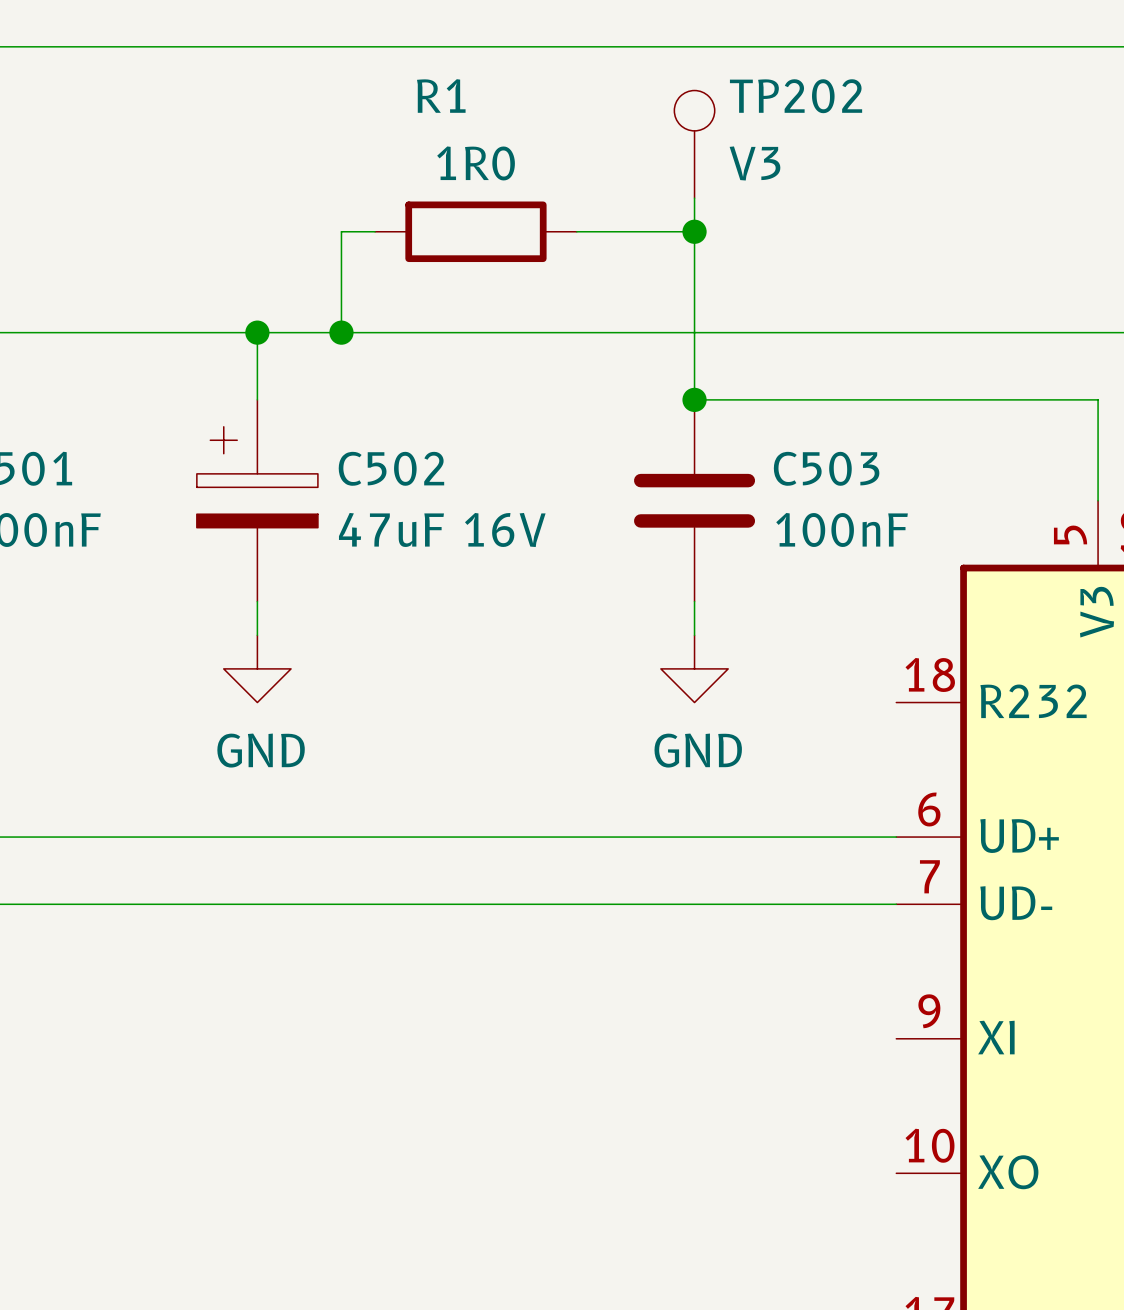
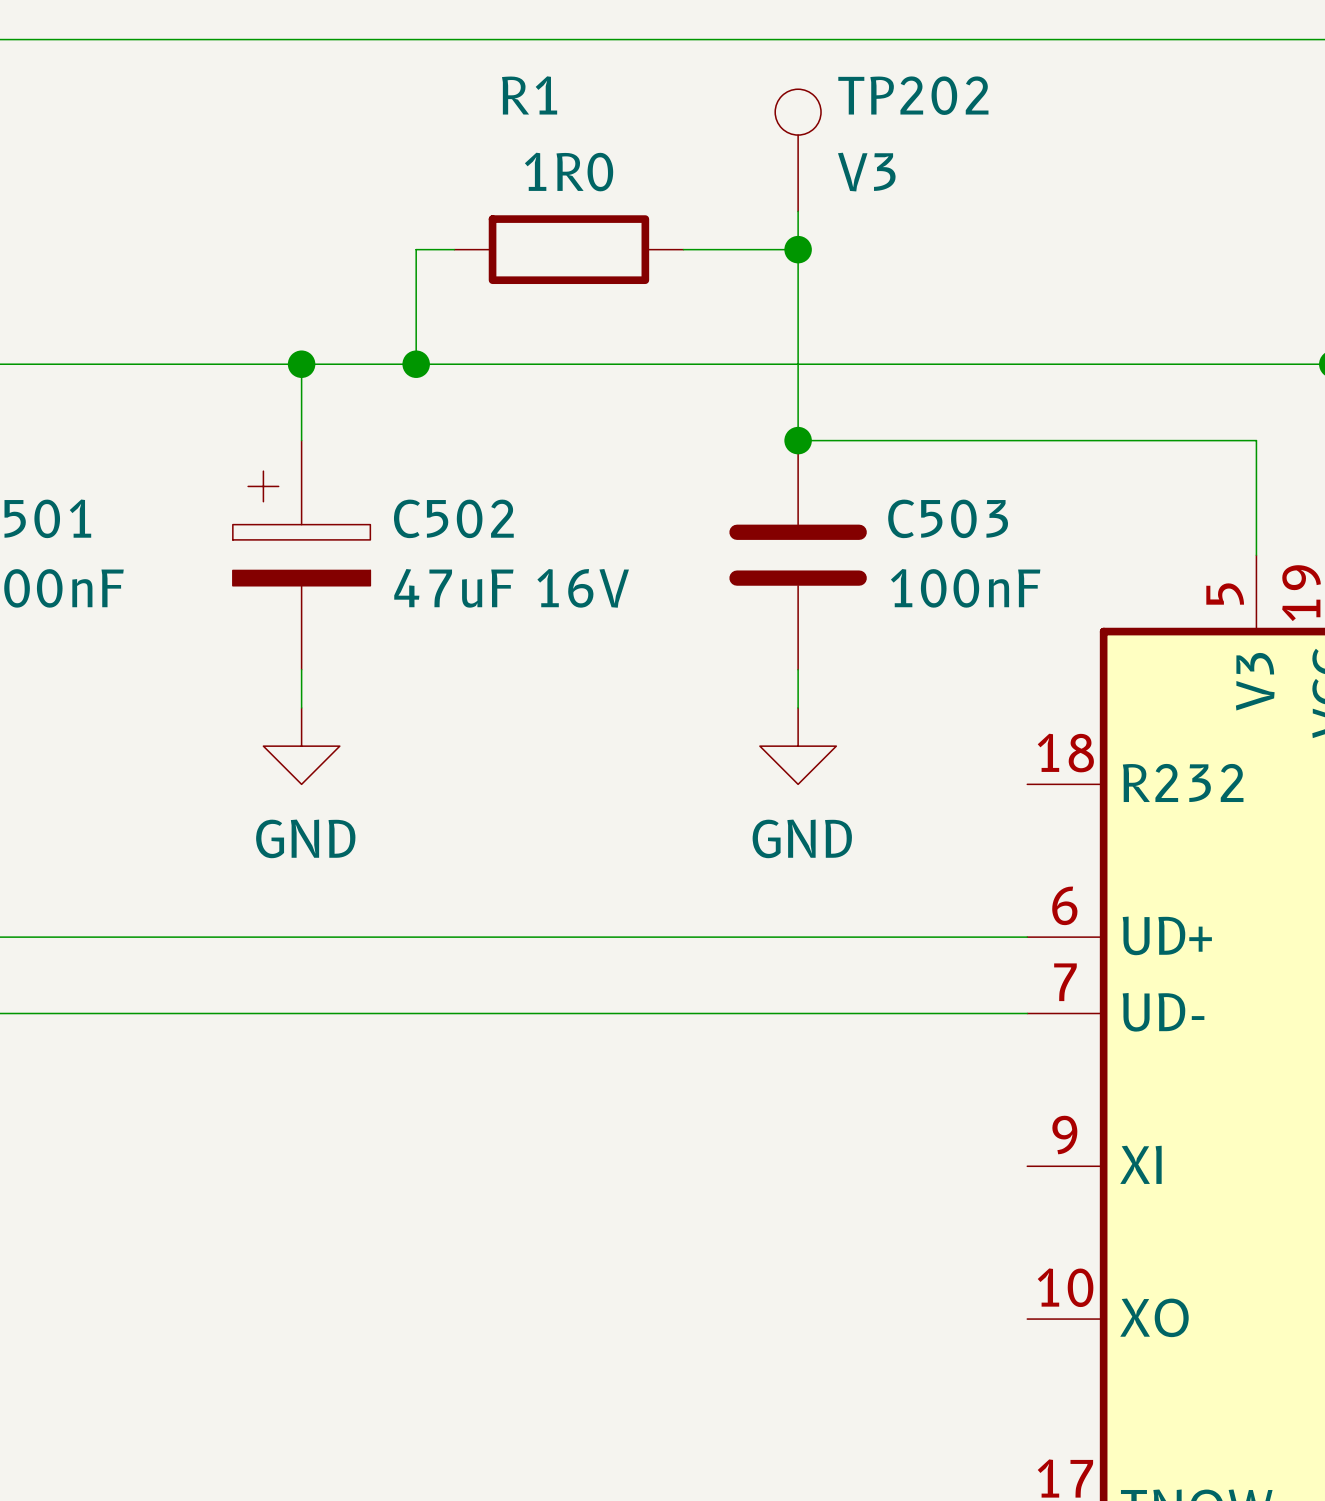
wire: (358, 231) (341, 231) (341, 332) -> (416, 249) (416, 364)
R1 position: (475, 231) -> (568, 249)
junction position: (341, 332) -> (416, 364)

